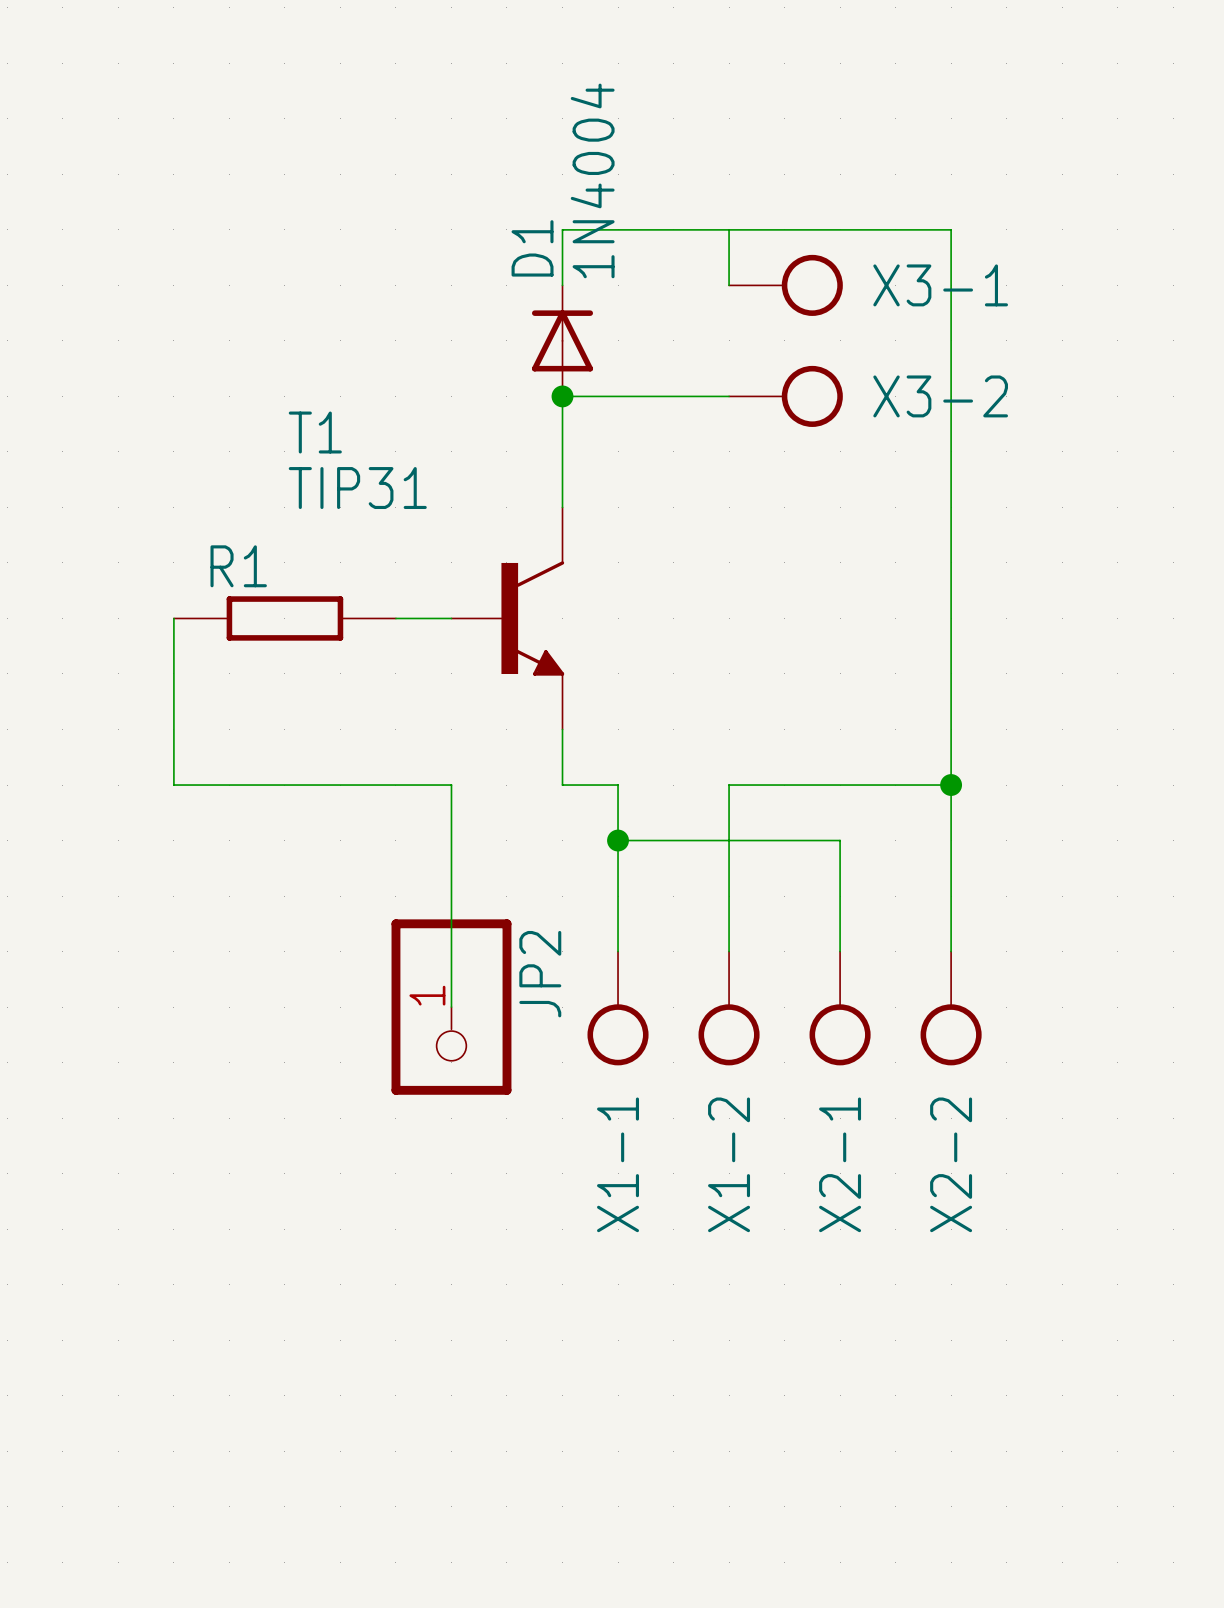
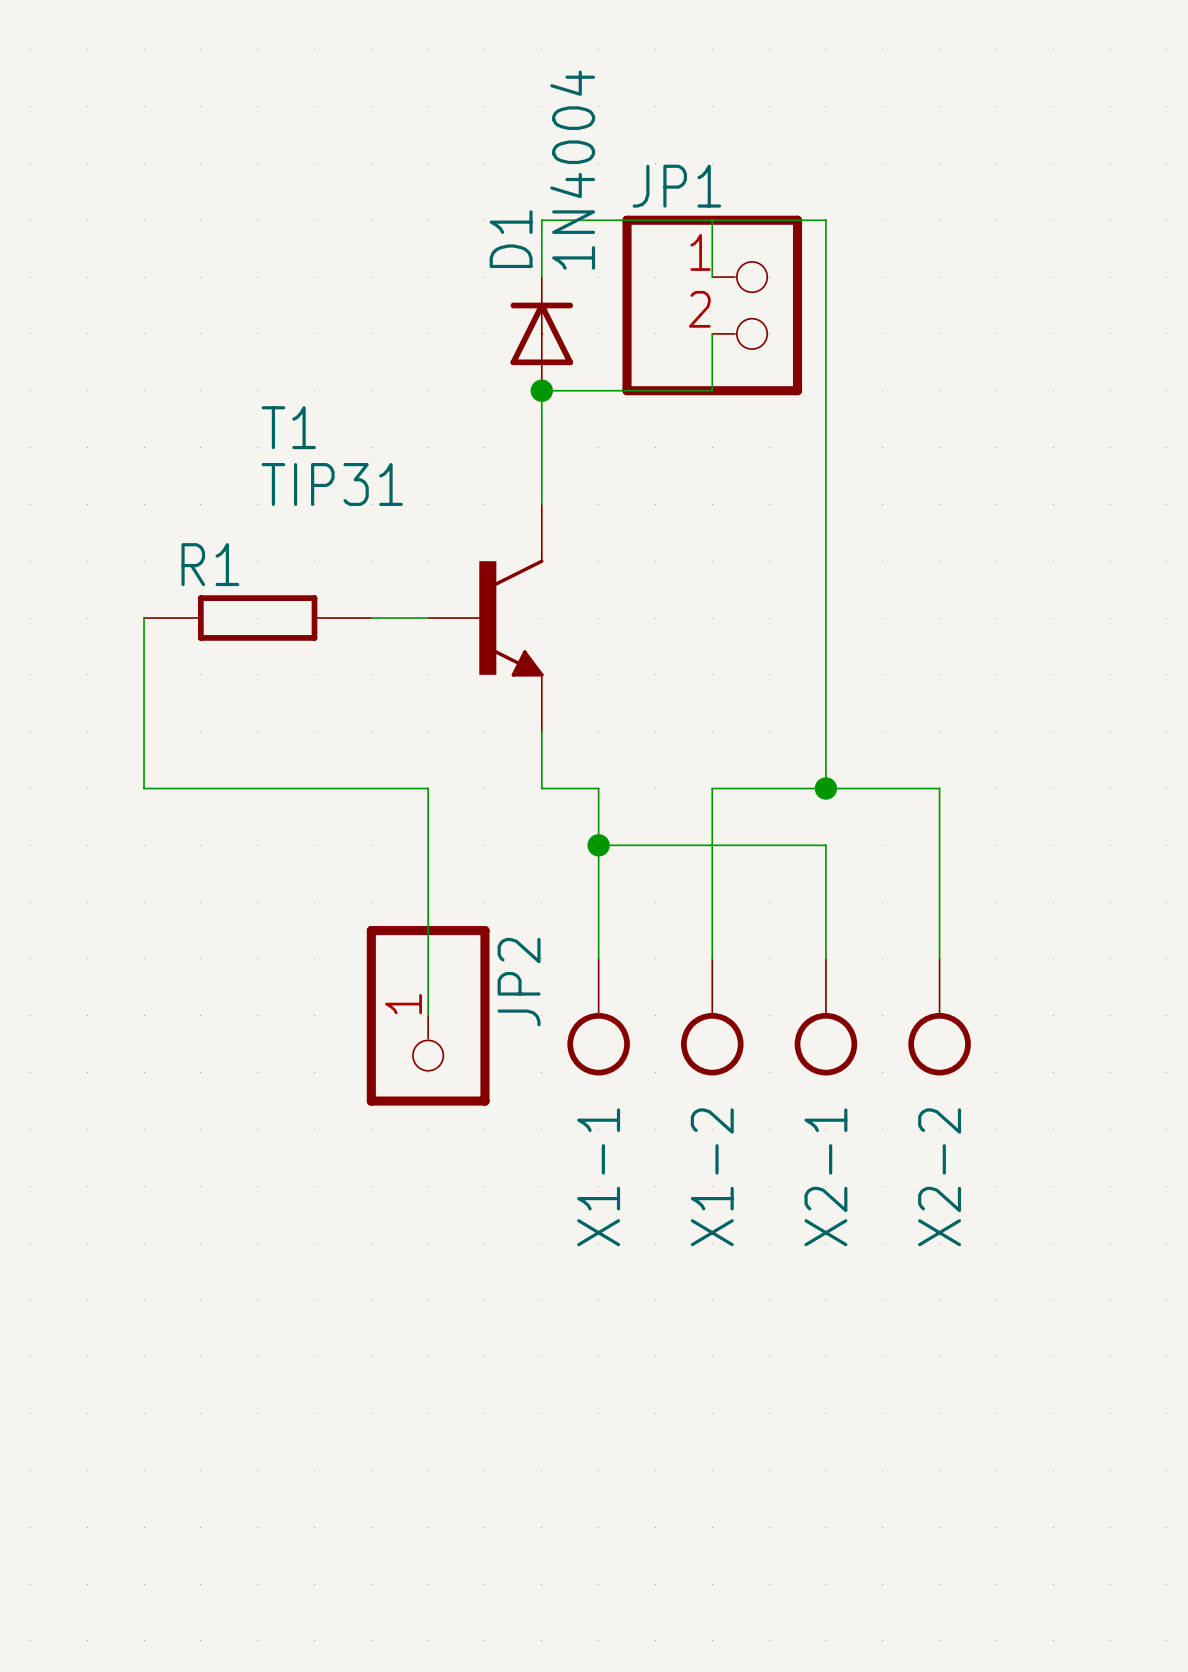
wire: (840, 229) (951, 229) (951, 785) -> (825, 220) (825, 788)
X3-1: (785, 285) -> none
JP1: none -> (712, 305)
wire: none -> (712, 333) (712, 390)
X3-2: (785, 396) -> none
junction position: (951, 785) -> (825, 788)

